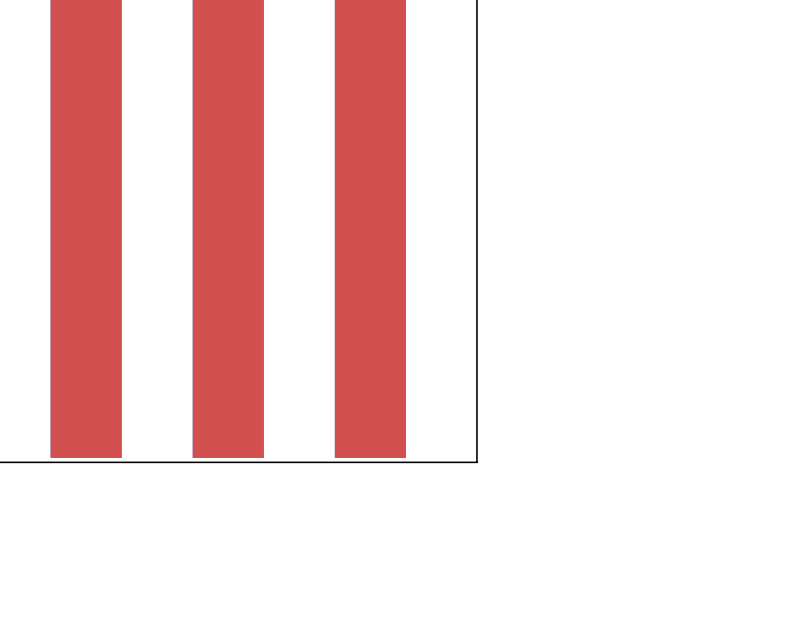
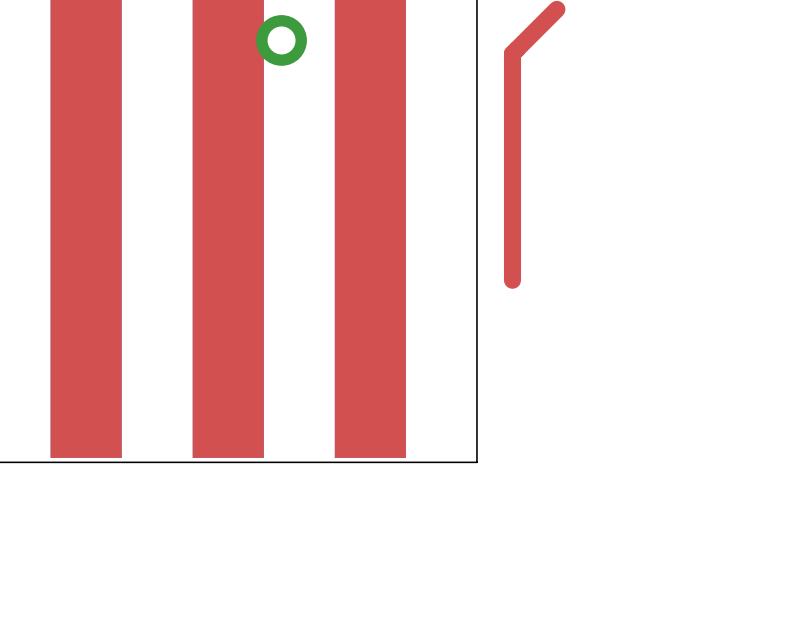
top track: none -> (556, 9) (512, 53) (512, 280)
via: none -> (281, 40)

